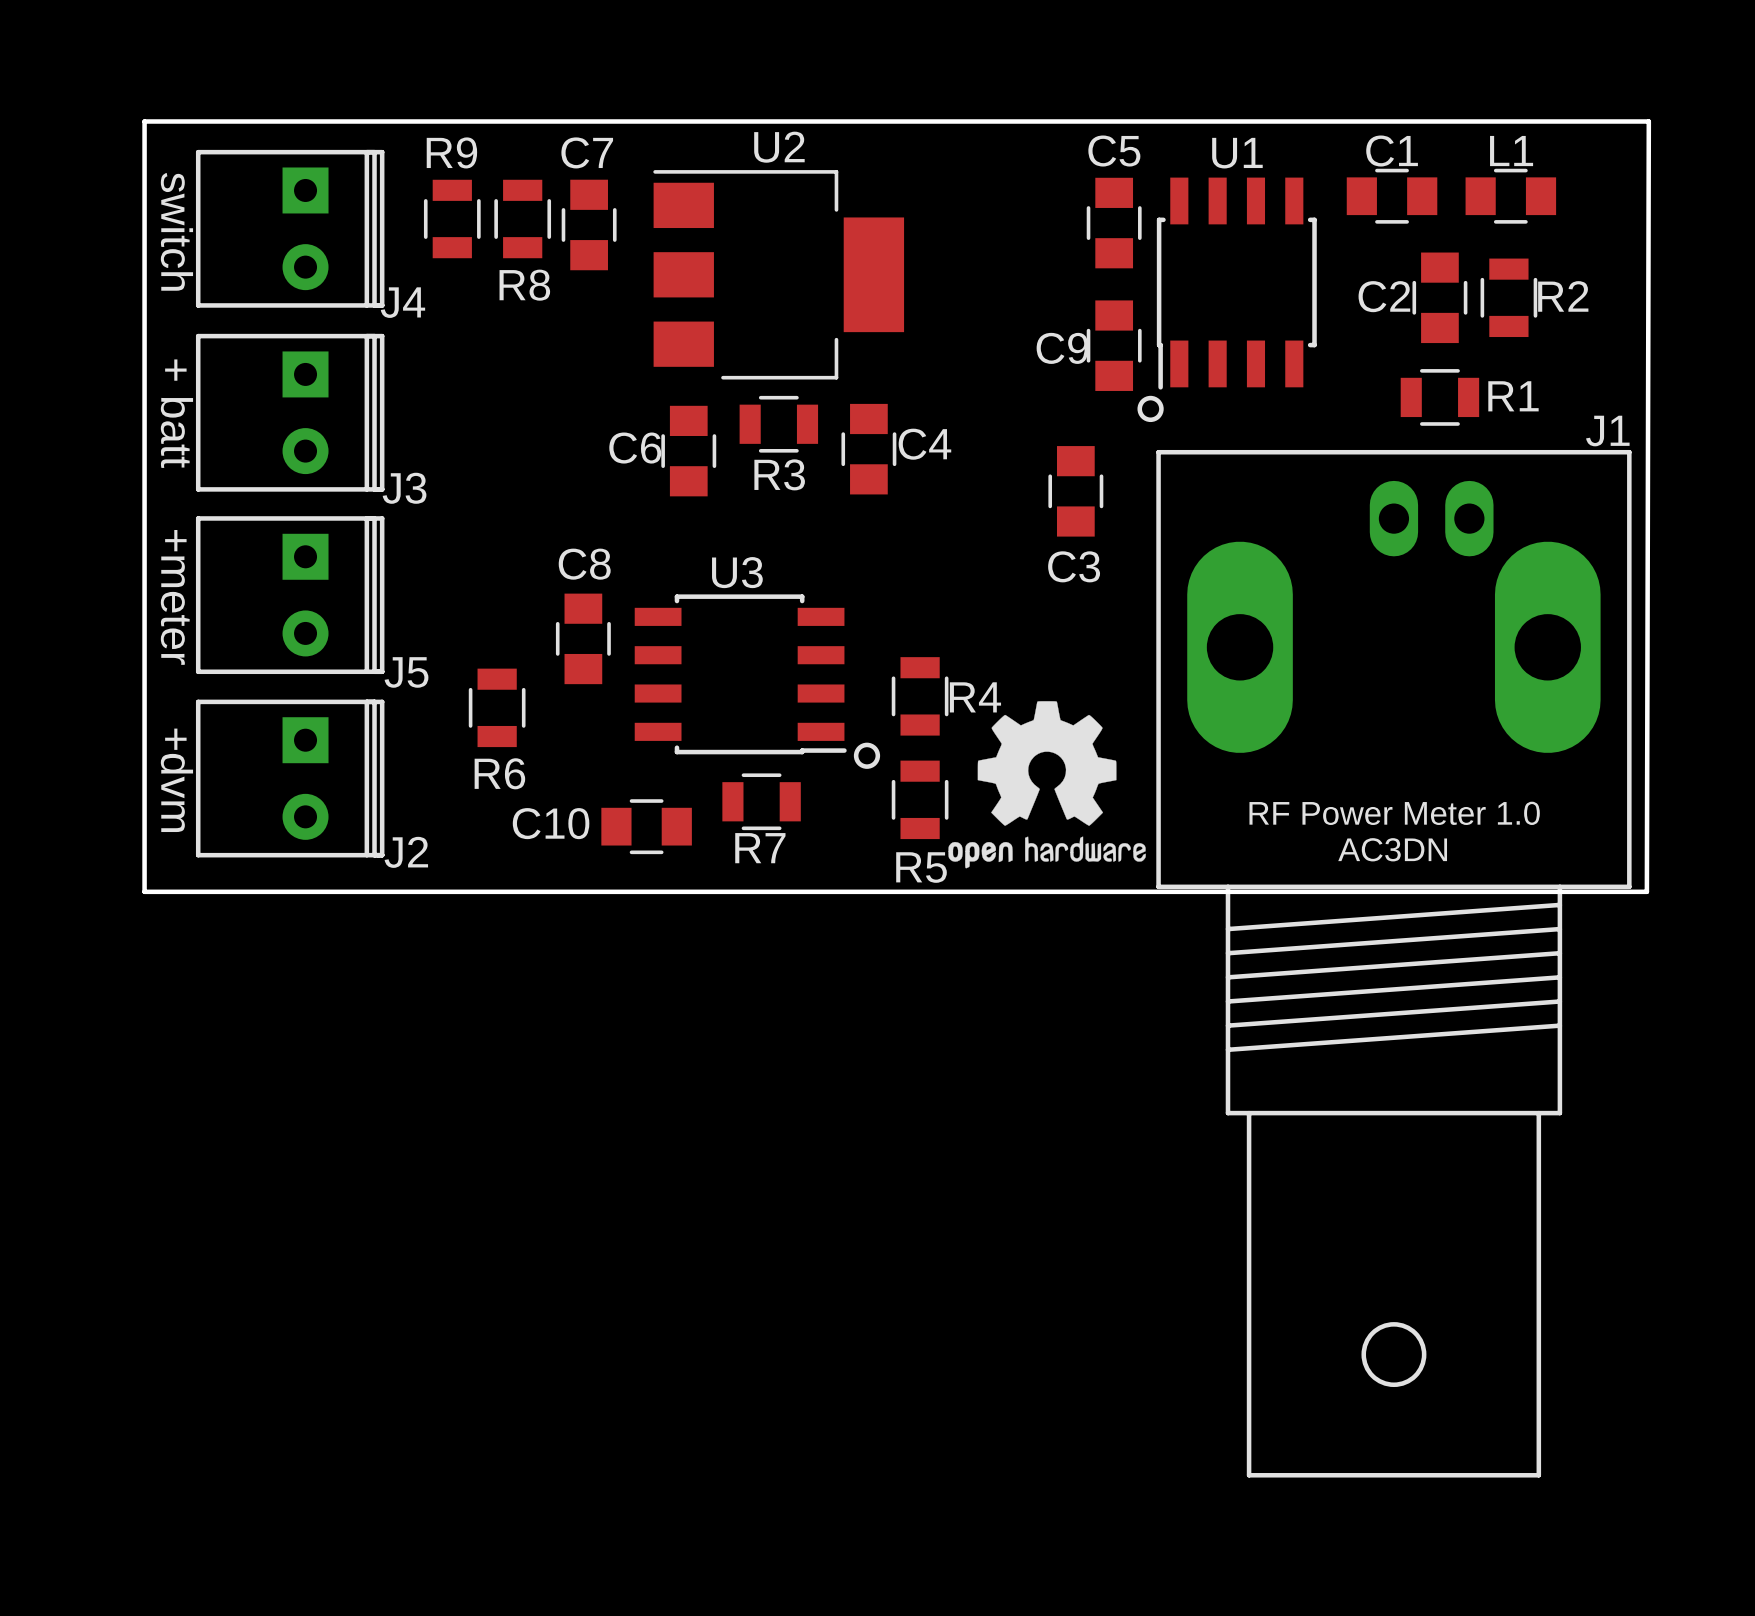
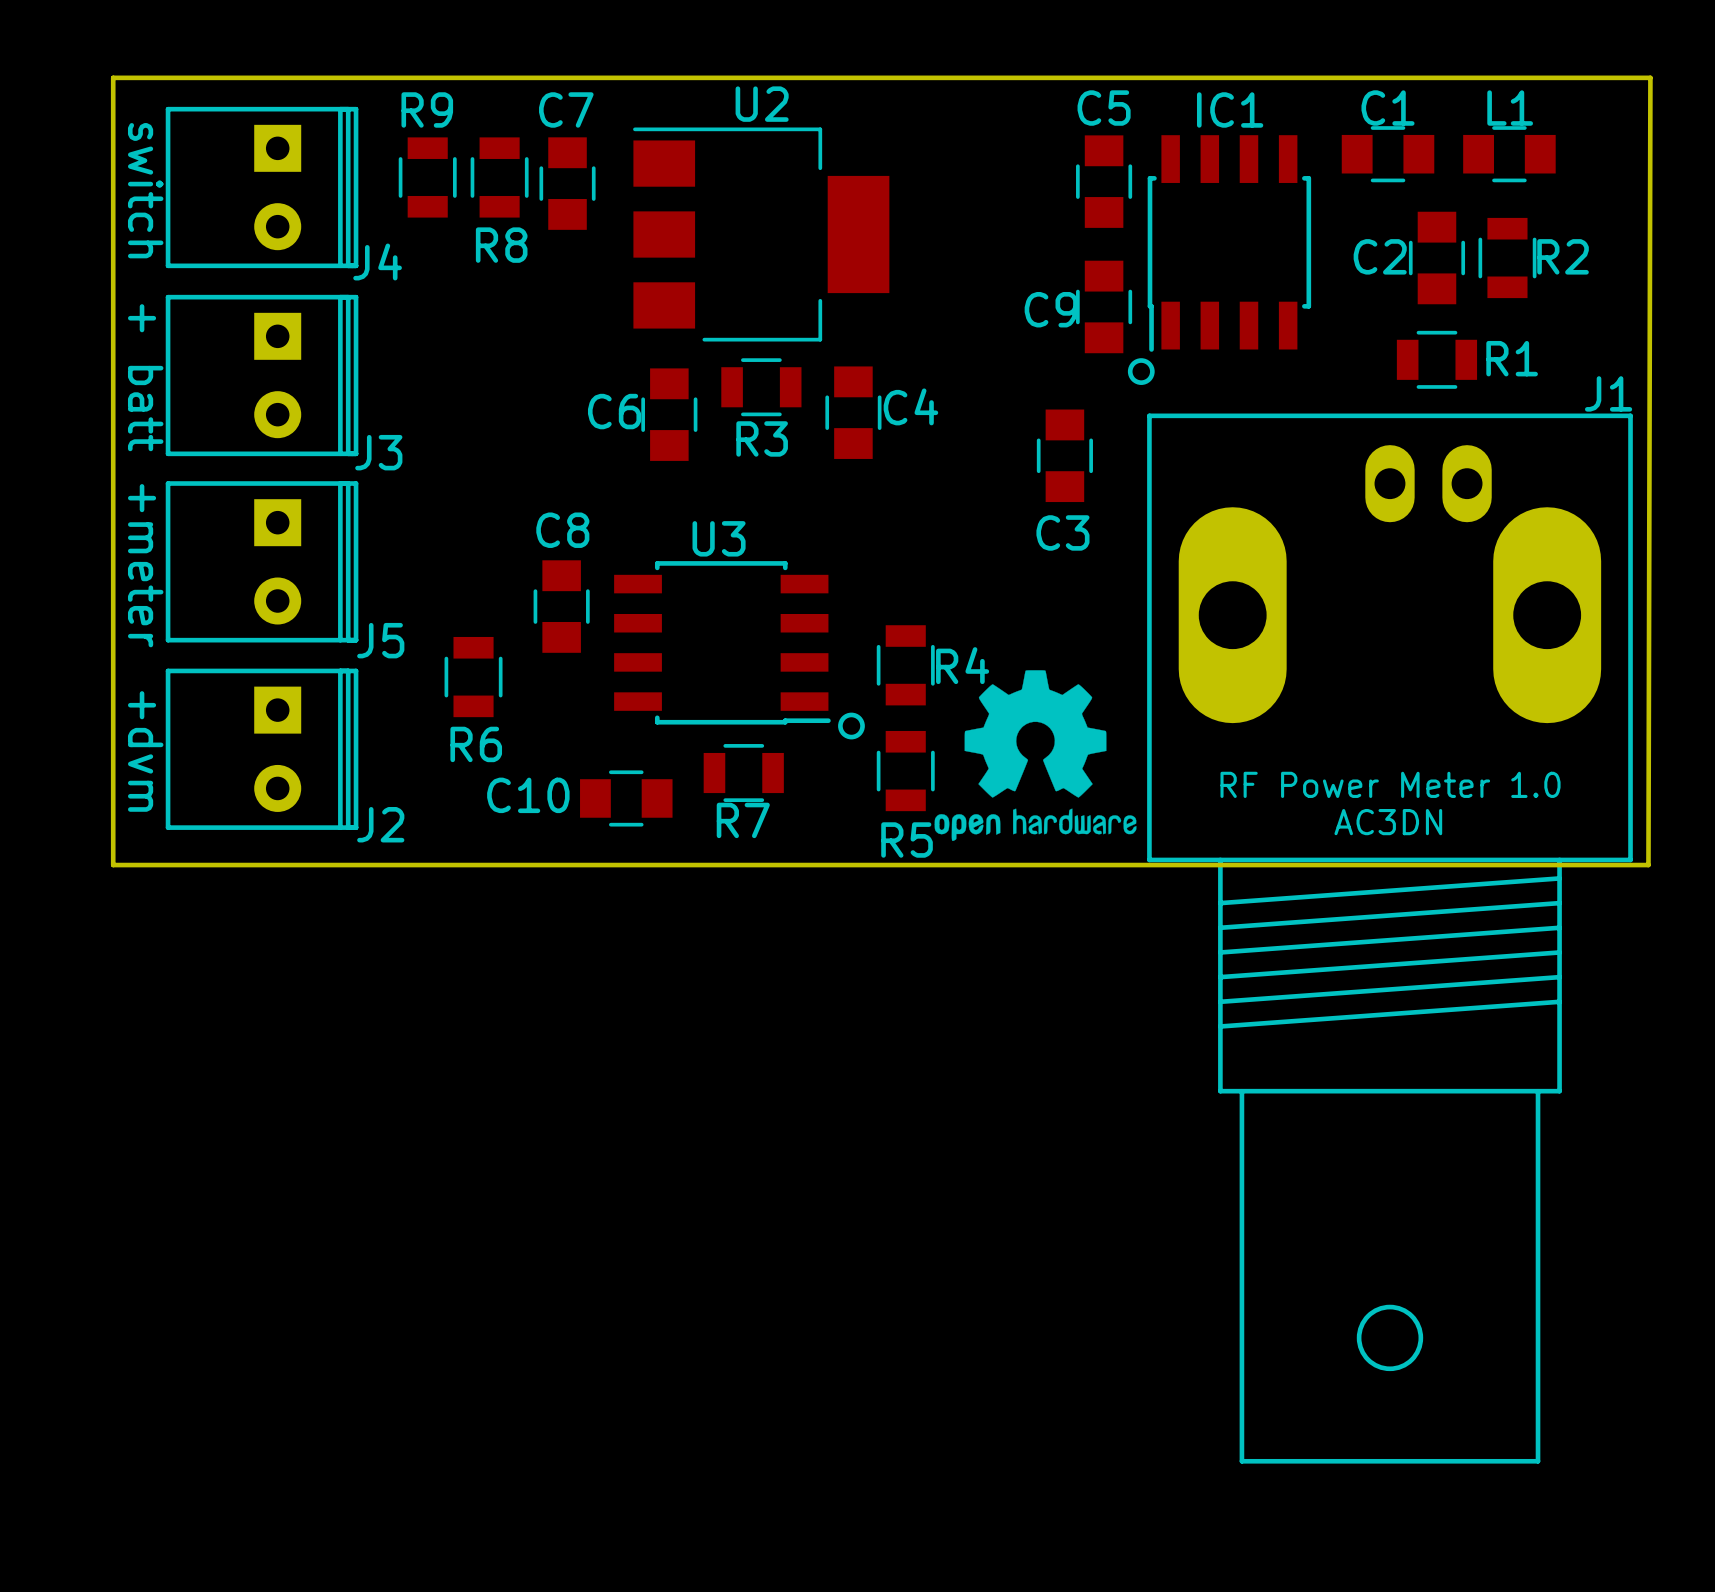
U1 name: U1 (1237, 153) -> IC1 (1230, 109)

